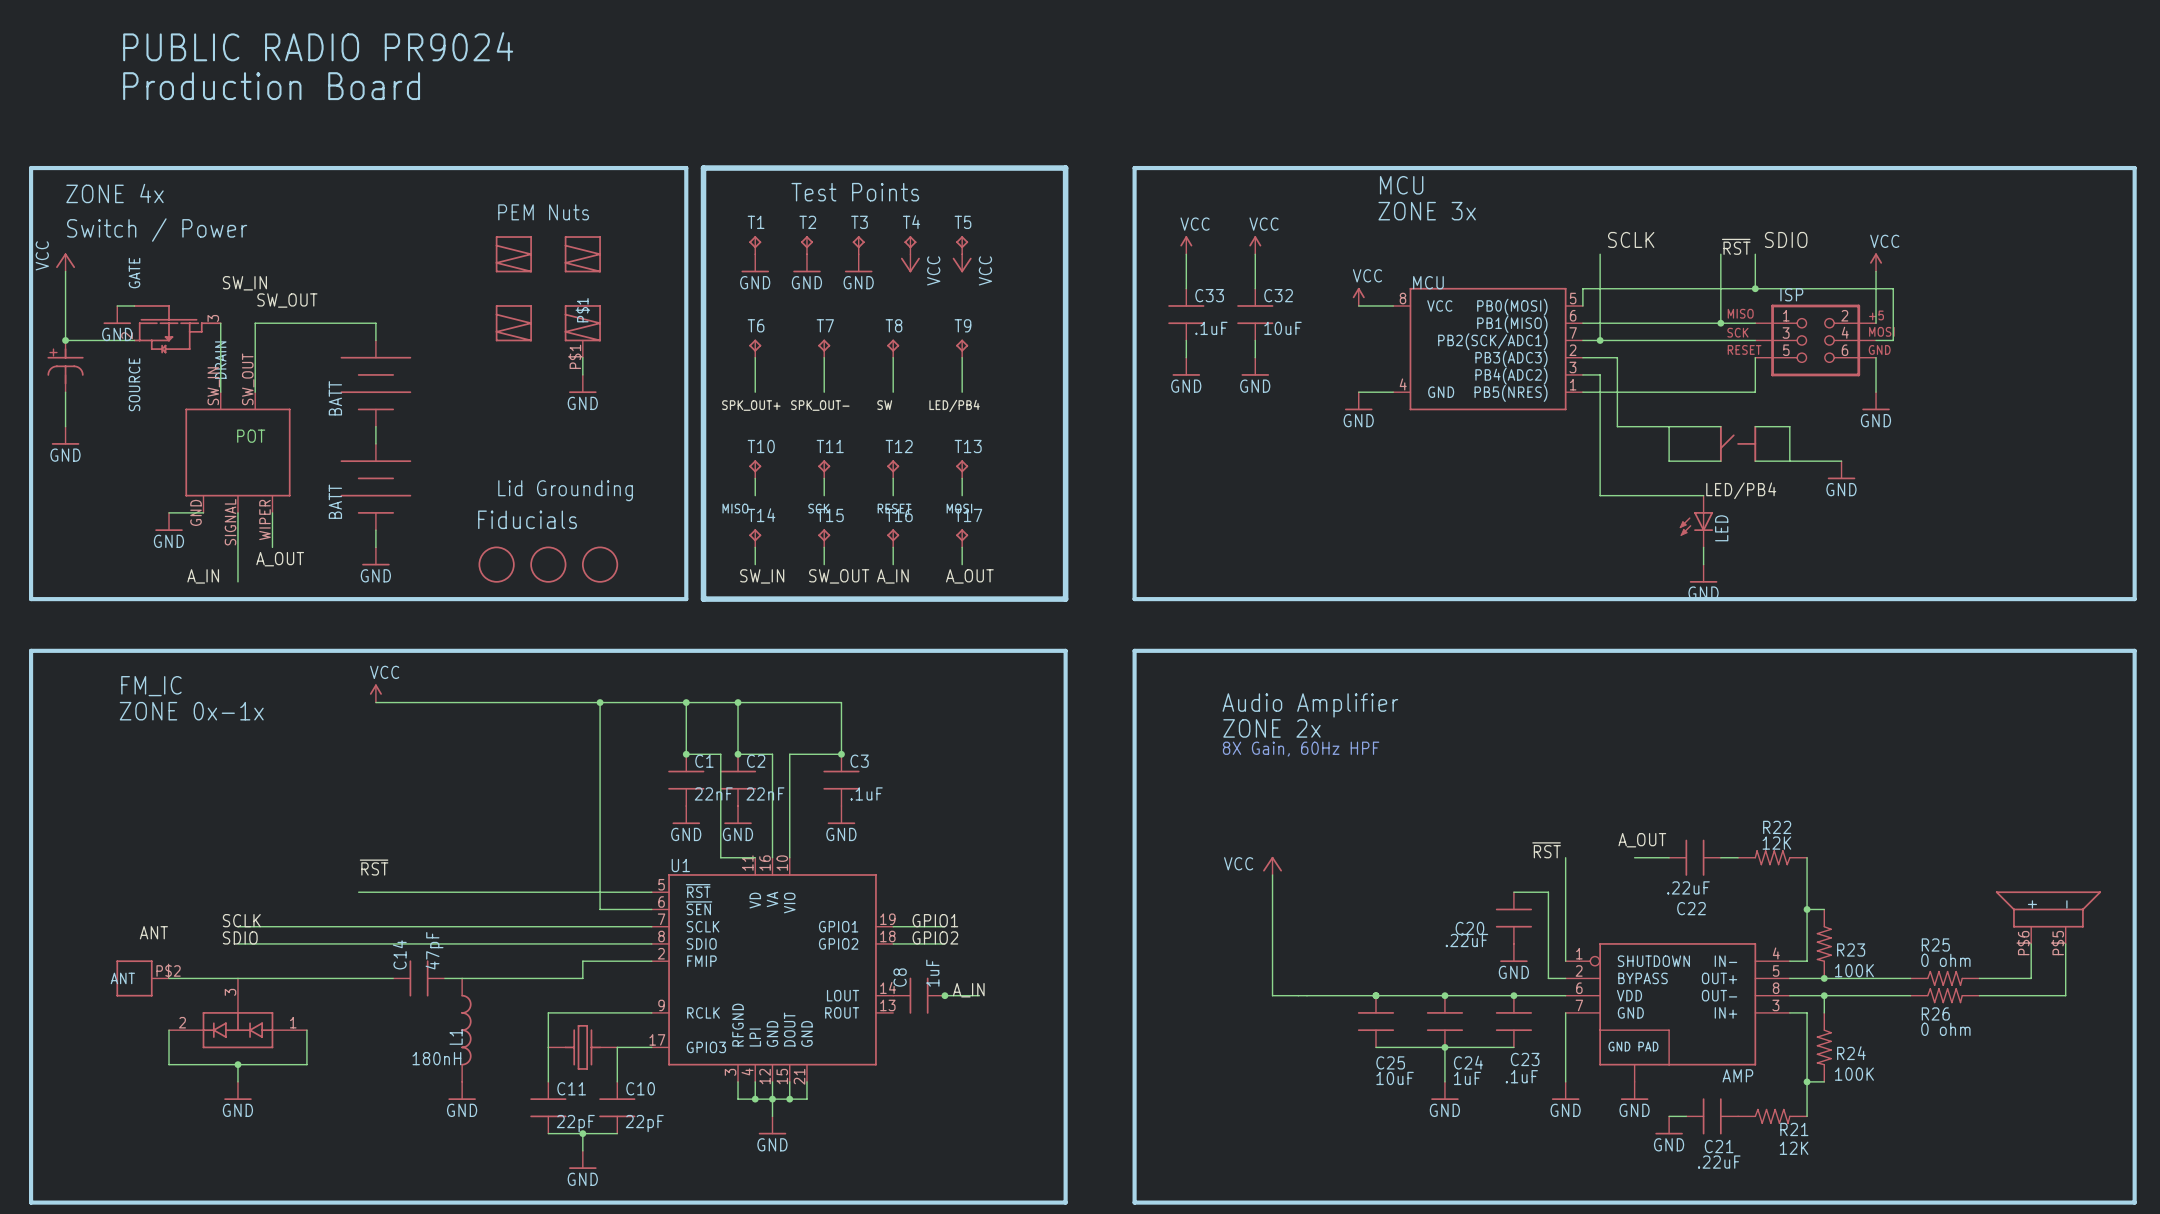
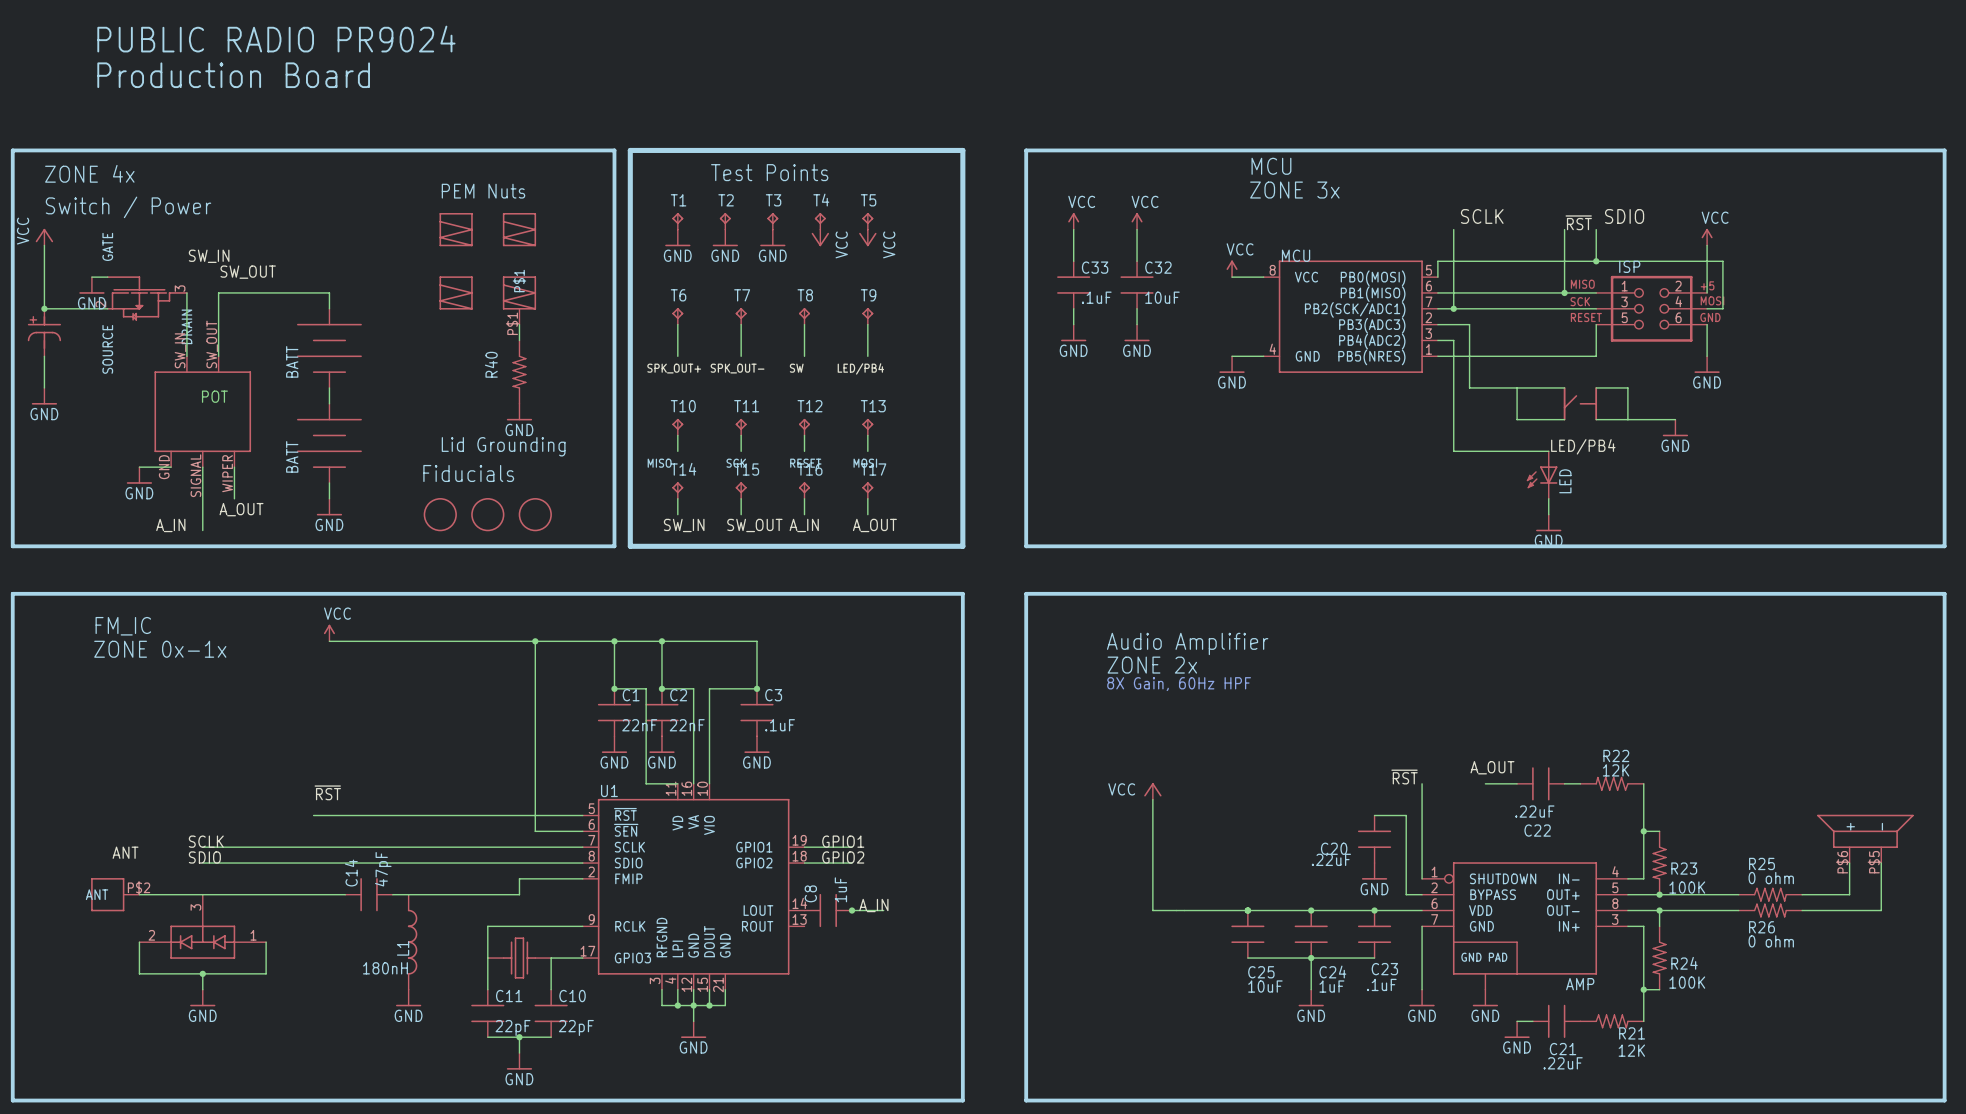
power symbol position: GND (582, 384) -> GND (519, 412)
R40: none -> (519, 372)

